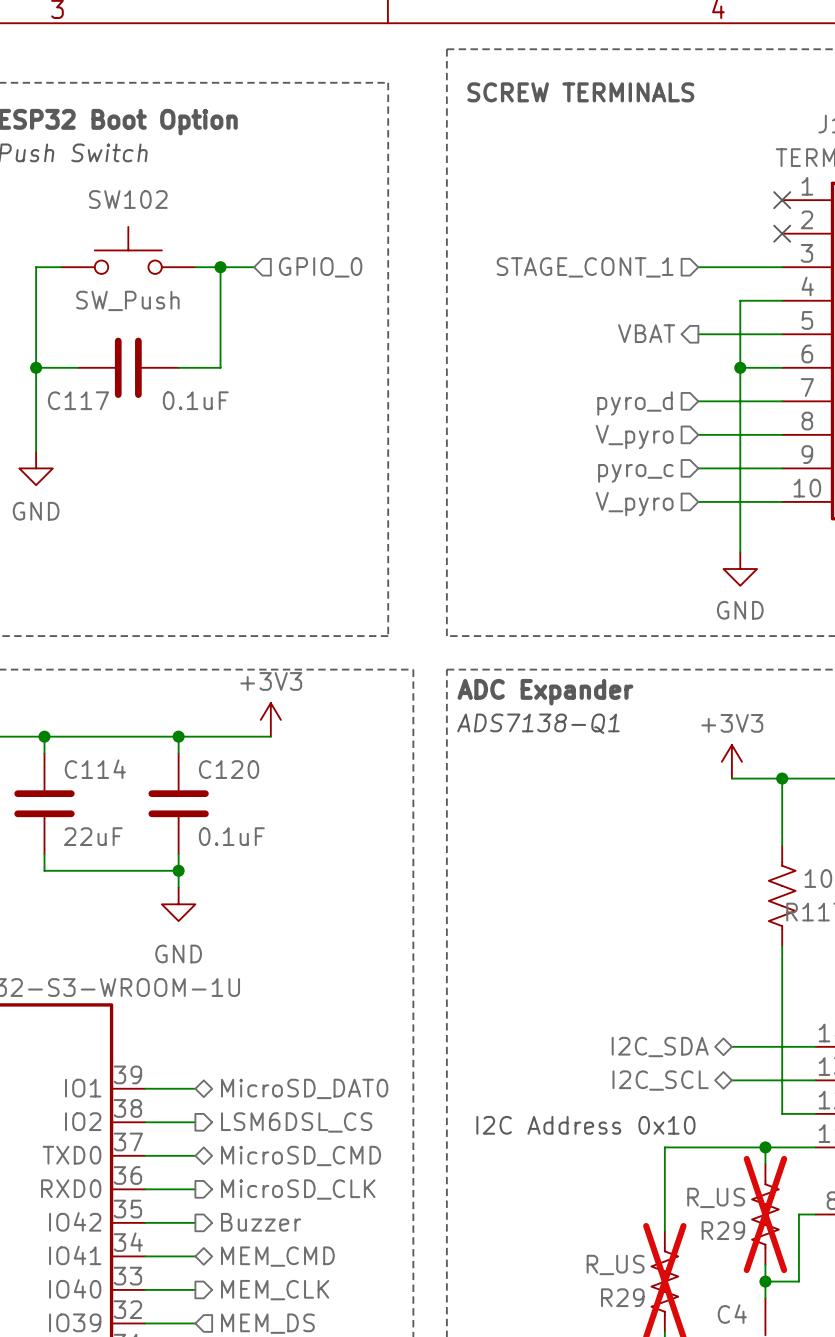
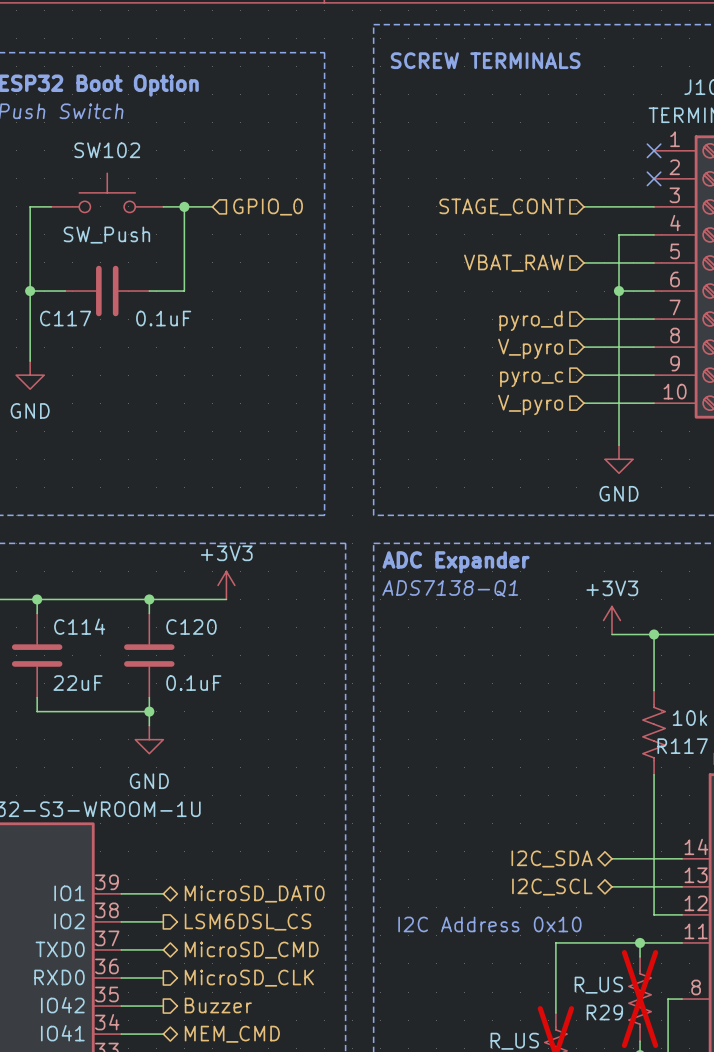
hierarchical label: STAGE_CONT_1 (585, 267) -> STAGE_CONT (501, 207)
hierarchical label shape: output (646, 333) -> input (513, 263)
hierarchical label: VBAT (646, 333) -> VBAT_RAW (513, 263)

